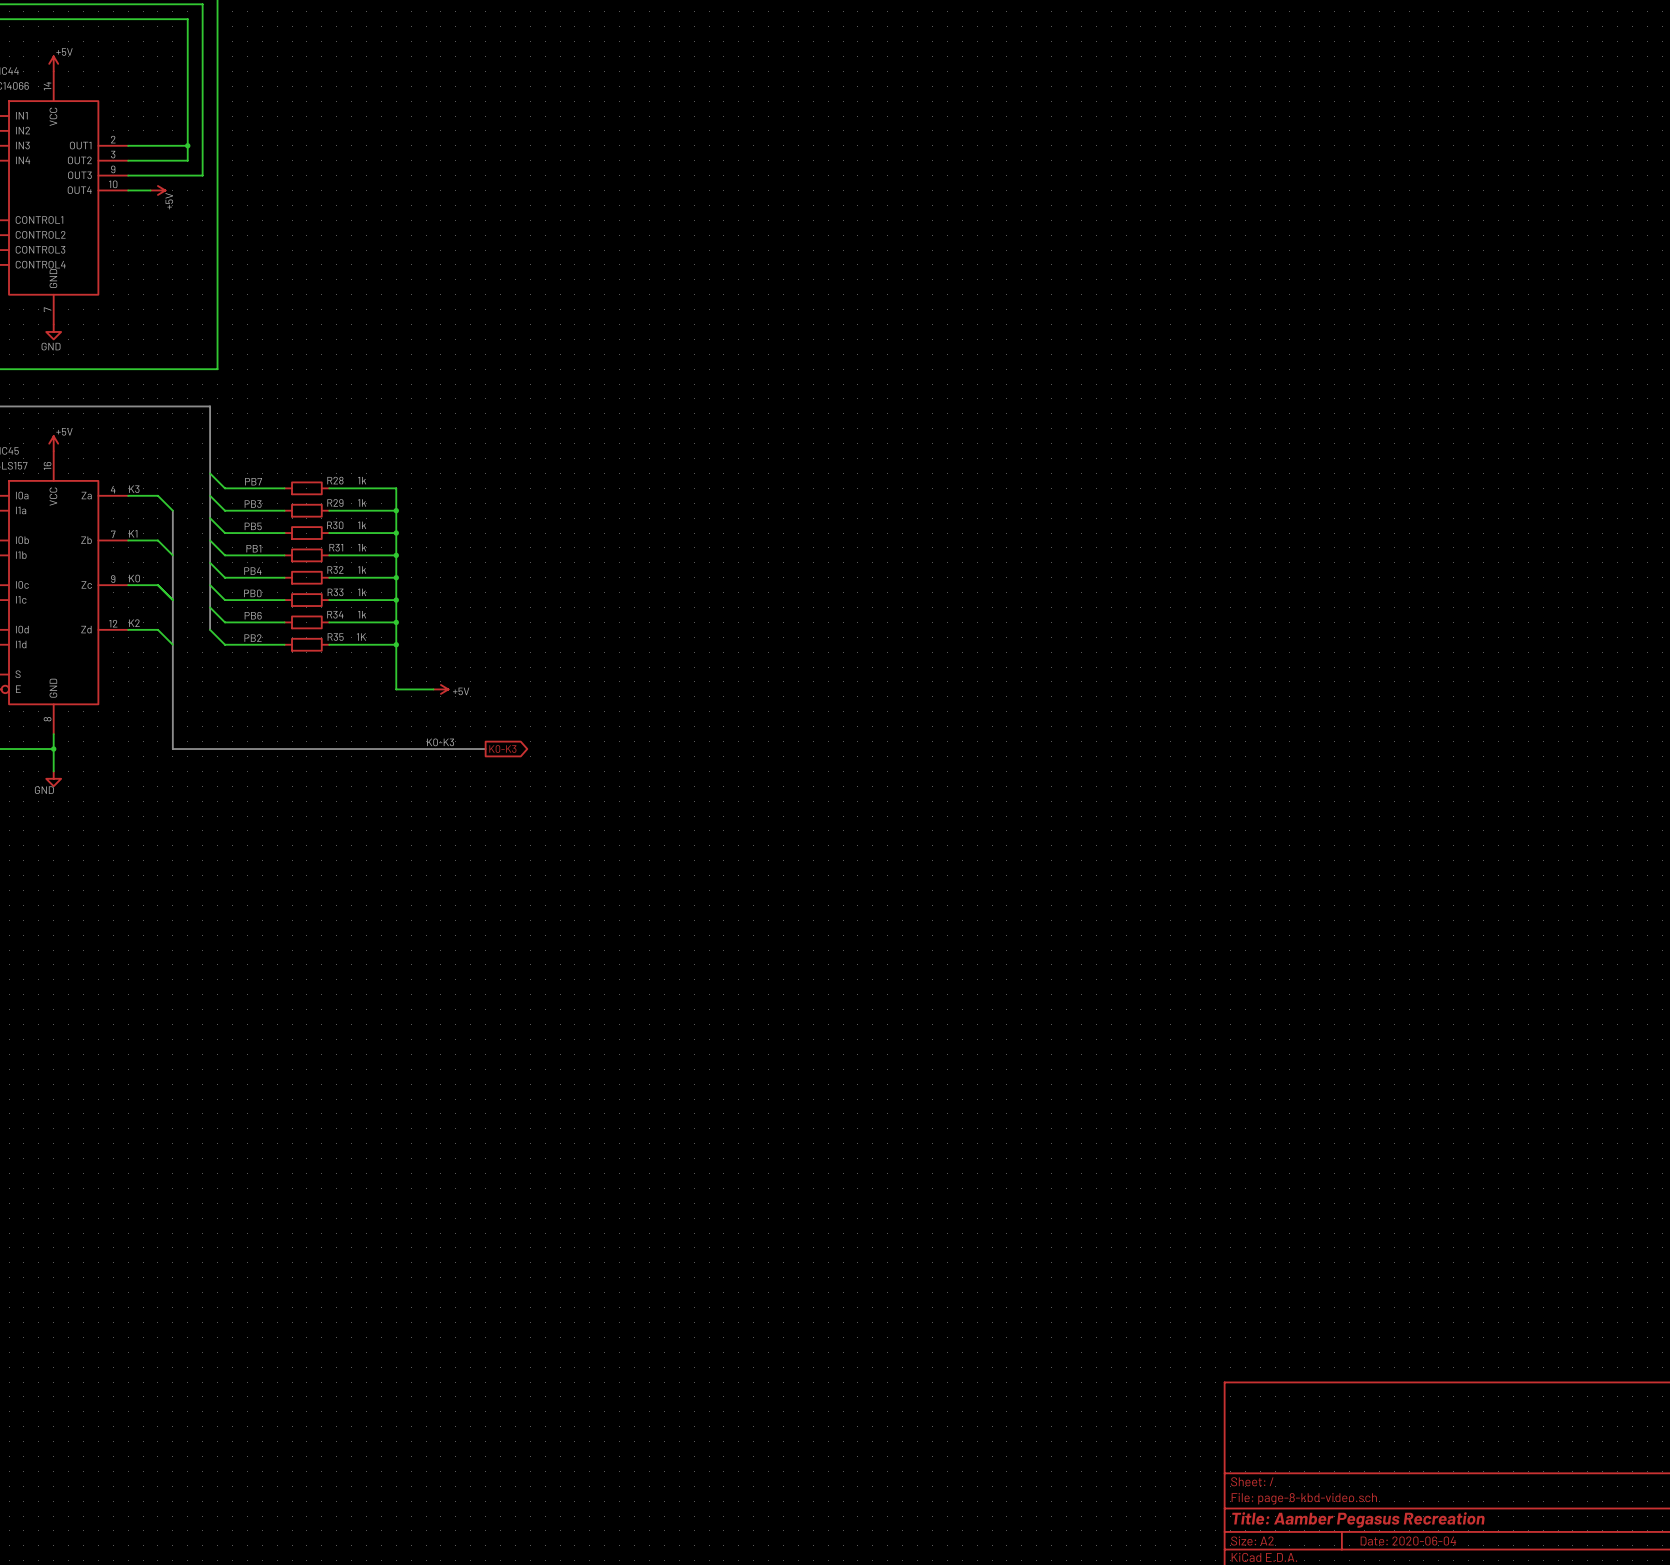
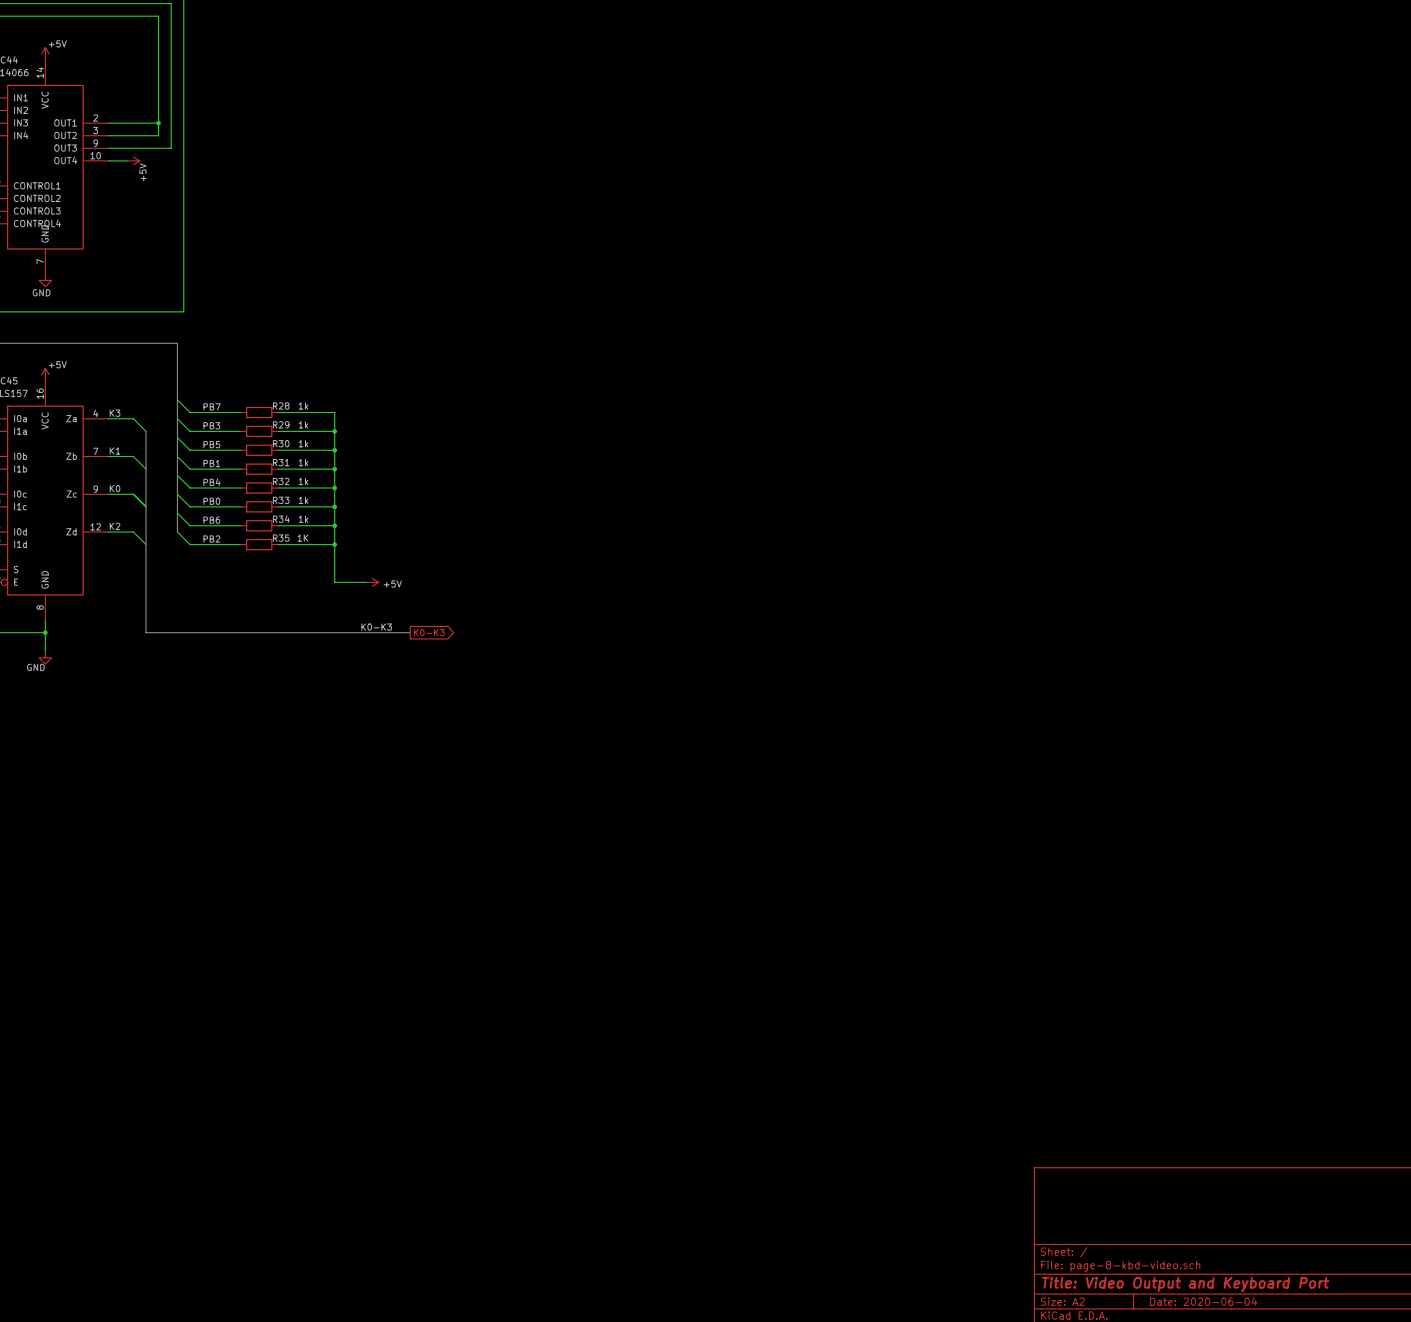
title block: Title: Aamber Pegasus Recreation (1358, 1520) -> Title: Video Output and Keyboard Port (1185, 1284)

